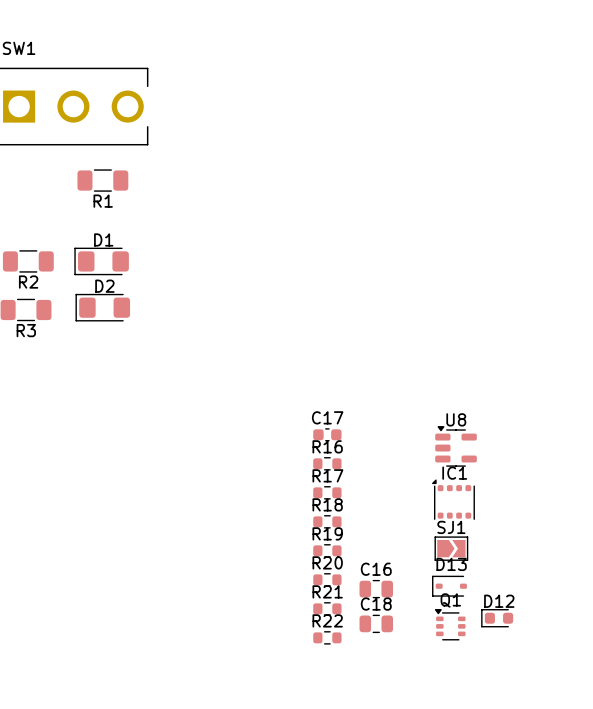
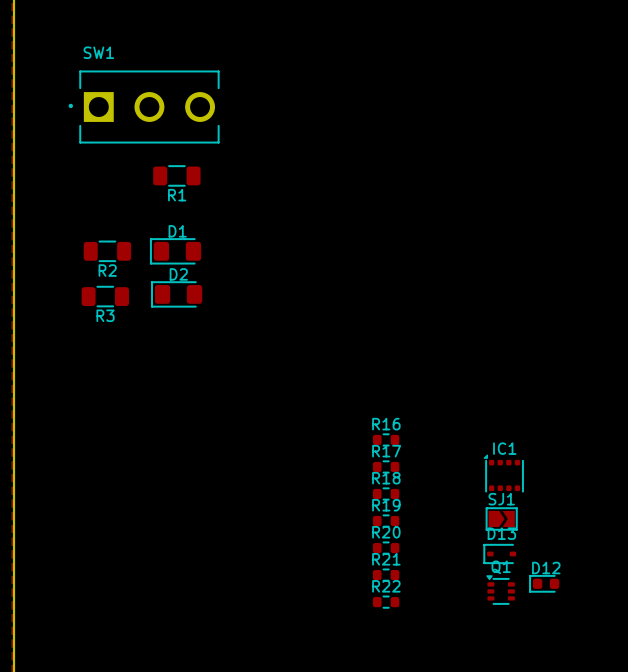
C17: (327, 434) -> none
U8: (456, 446) -> none
C16: (376, 589) -> none
C18: (376, 623) -> none

